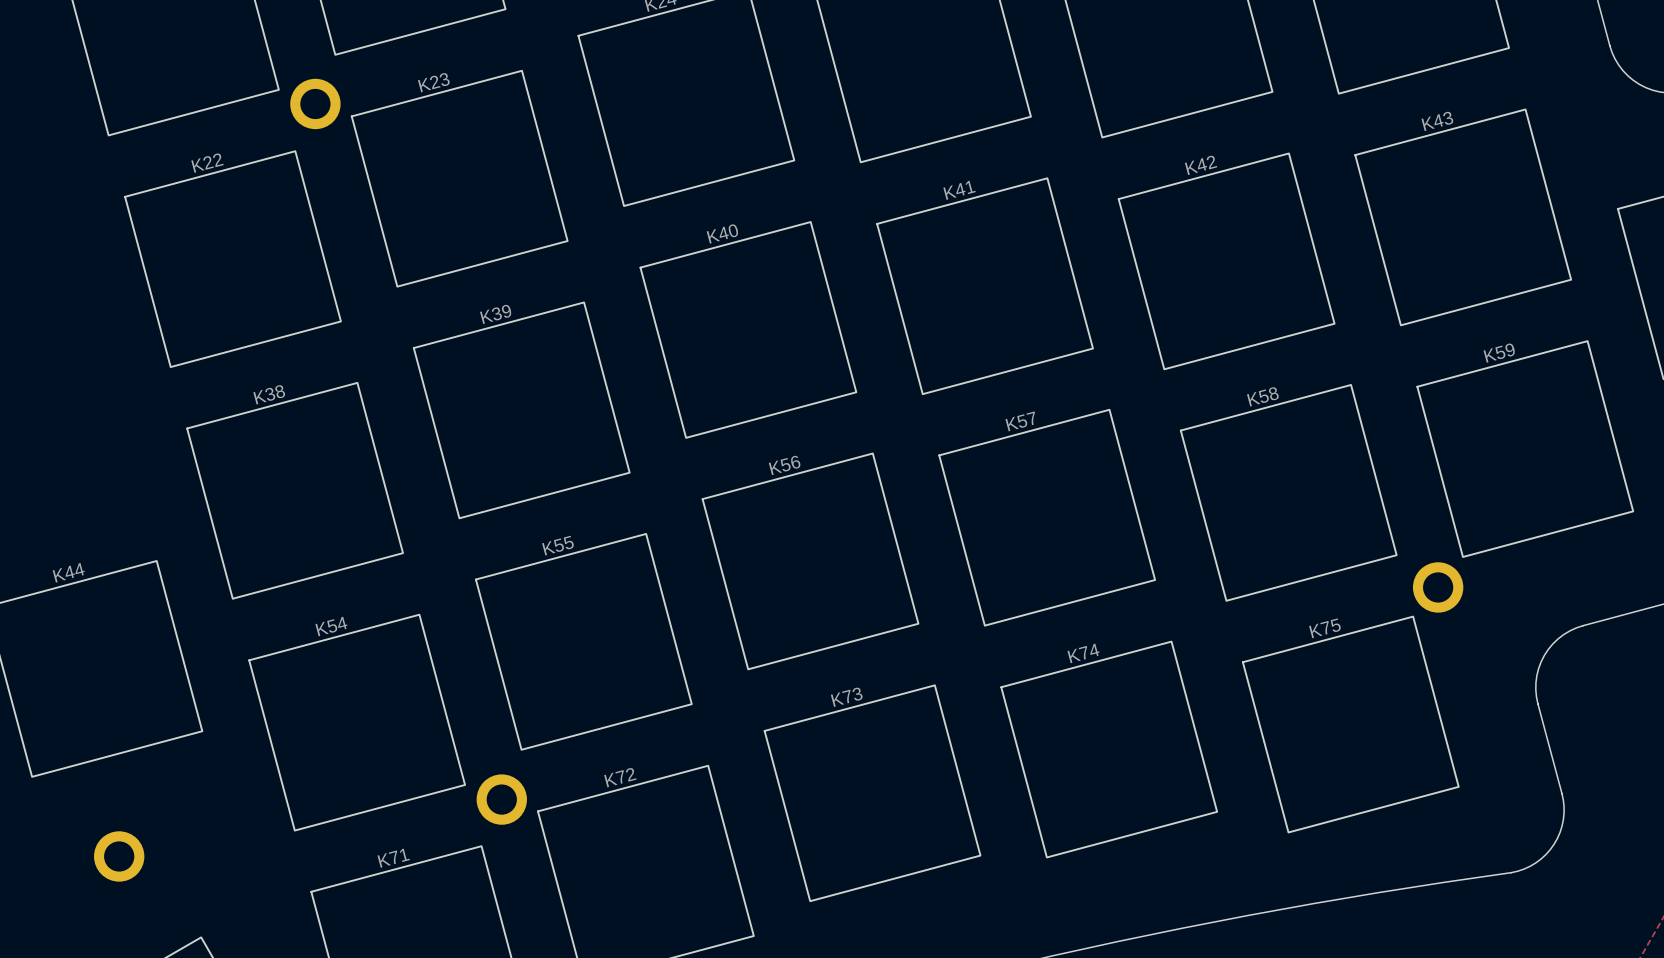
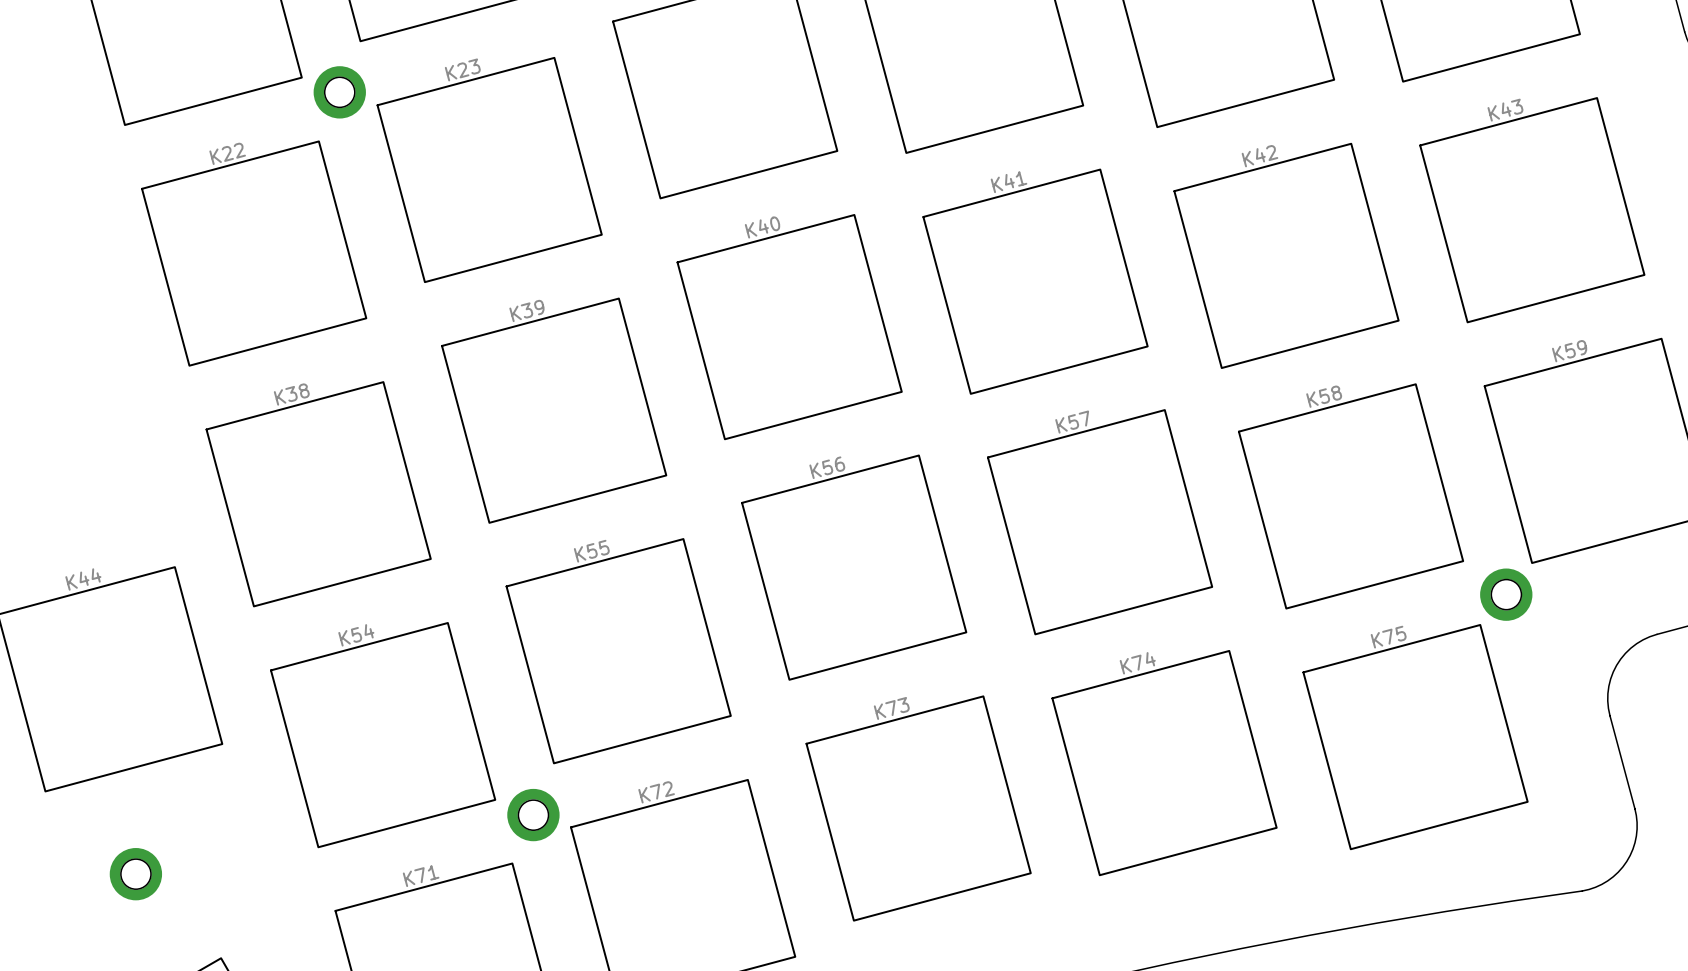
round board edge: none -> [324, 76, 356, 109]
round board edge: none -> [1490, 578, 1523, 611]
round board edge: none -> [517, 799, 550, 831]
round board edge: none -> [120, 858, 152, 890]

